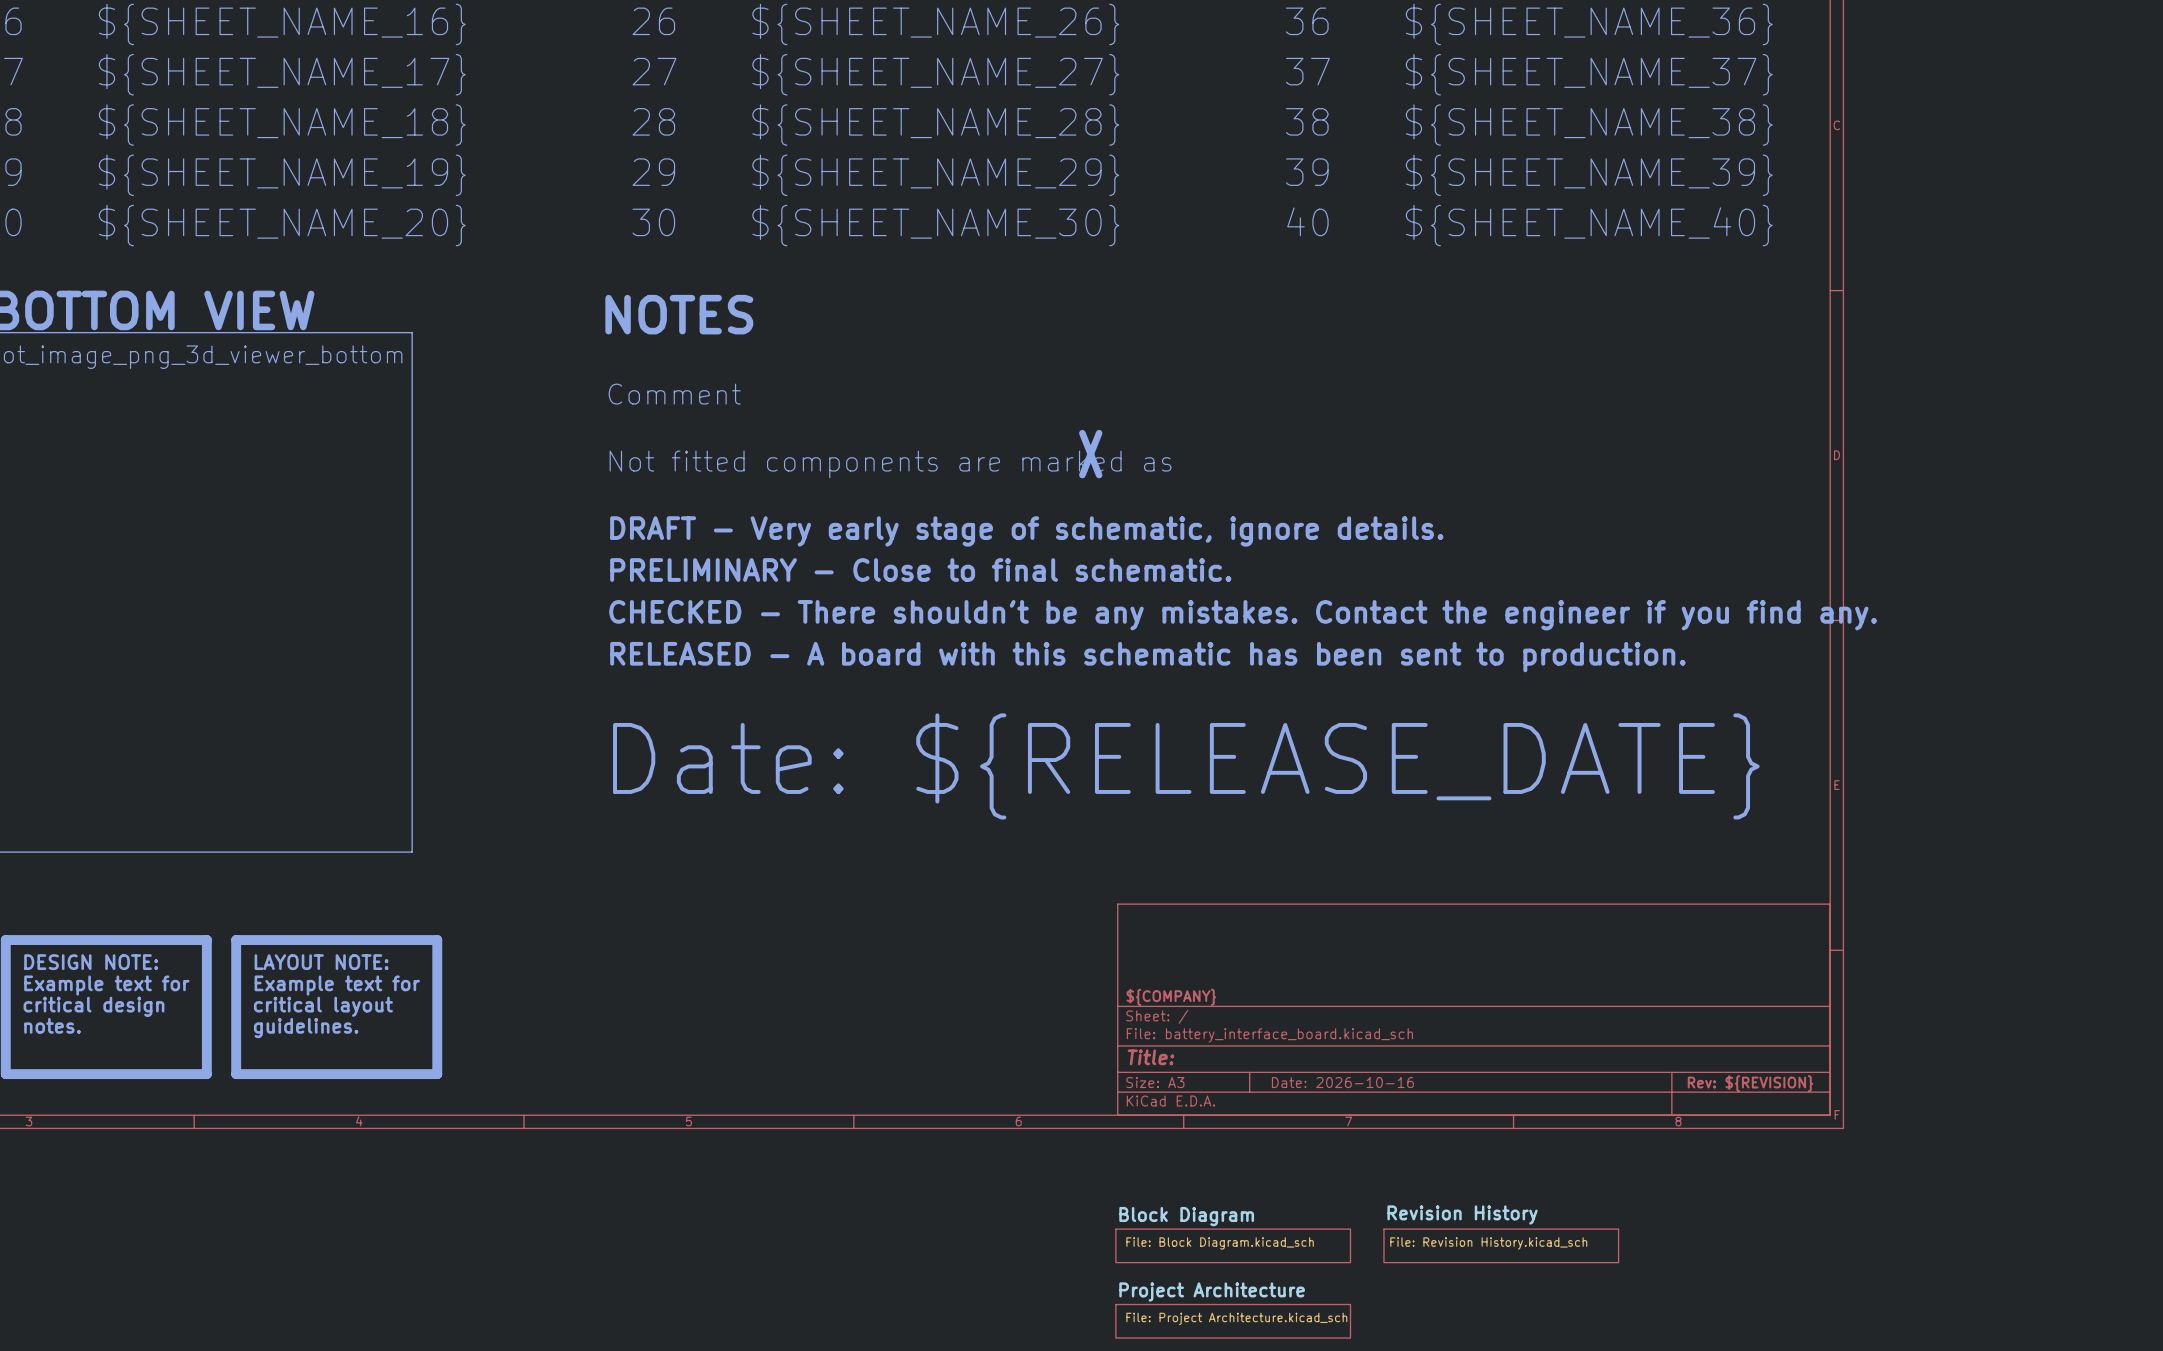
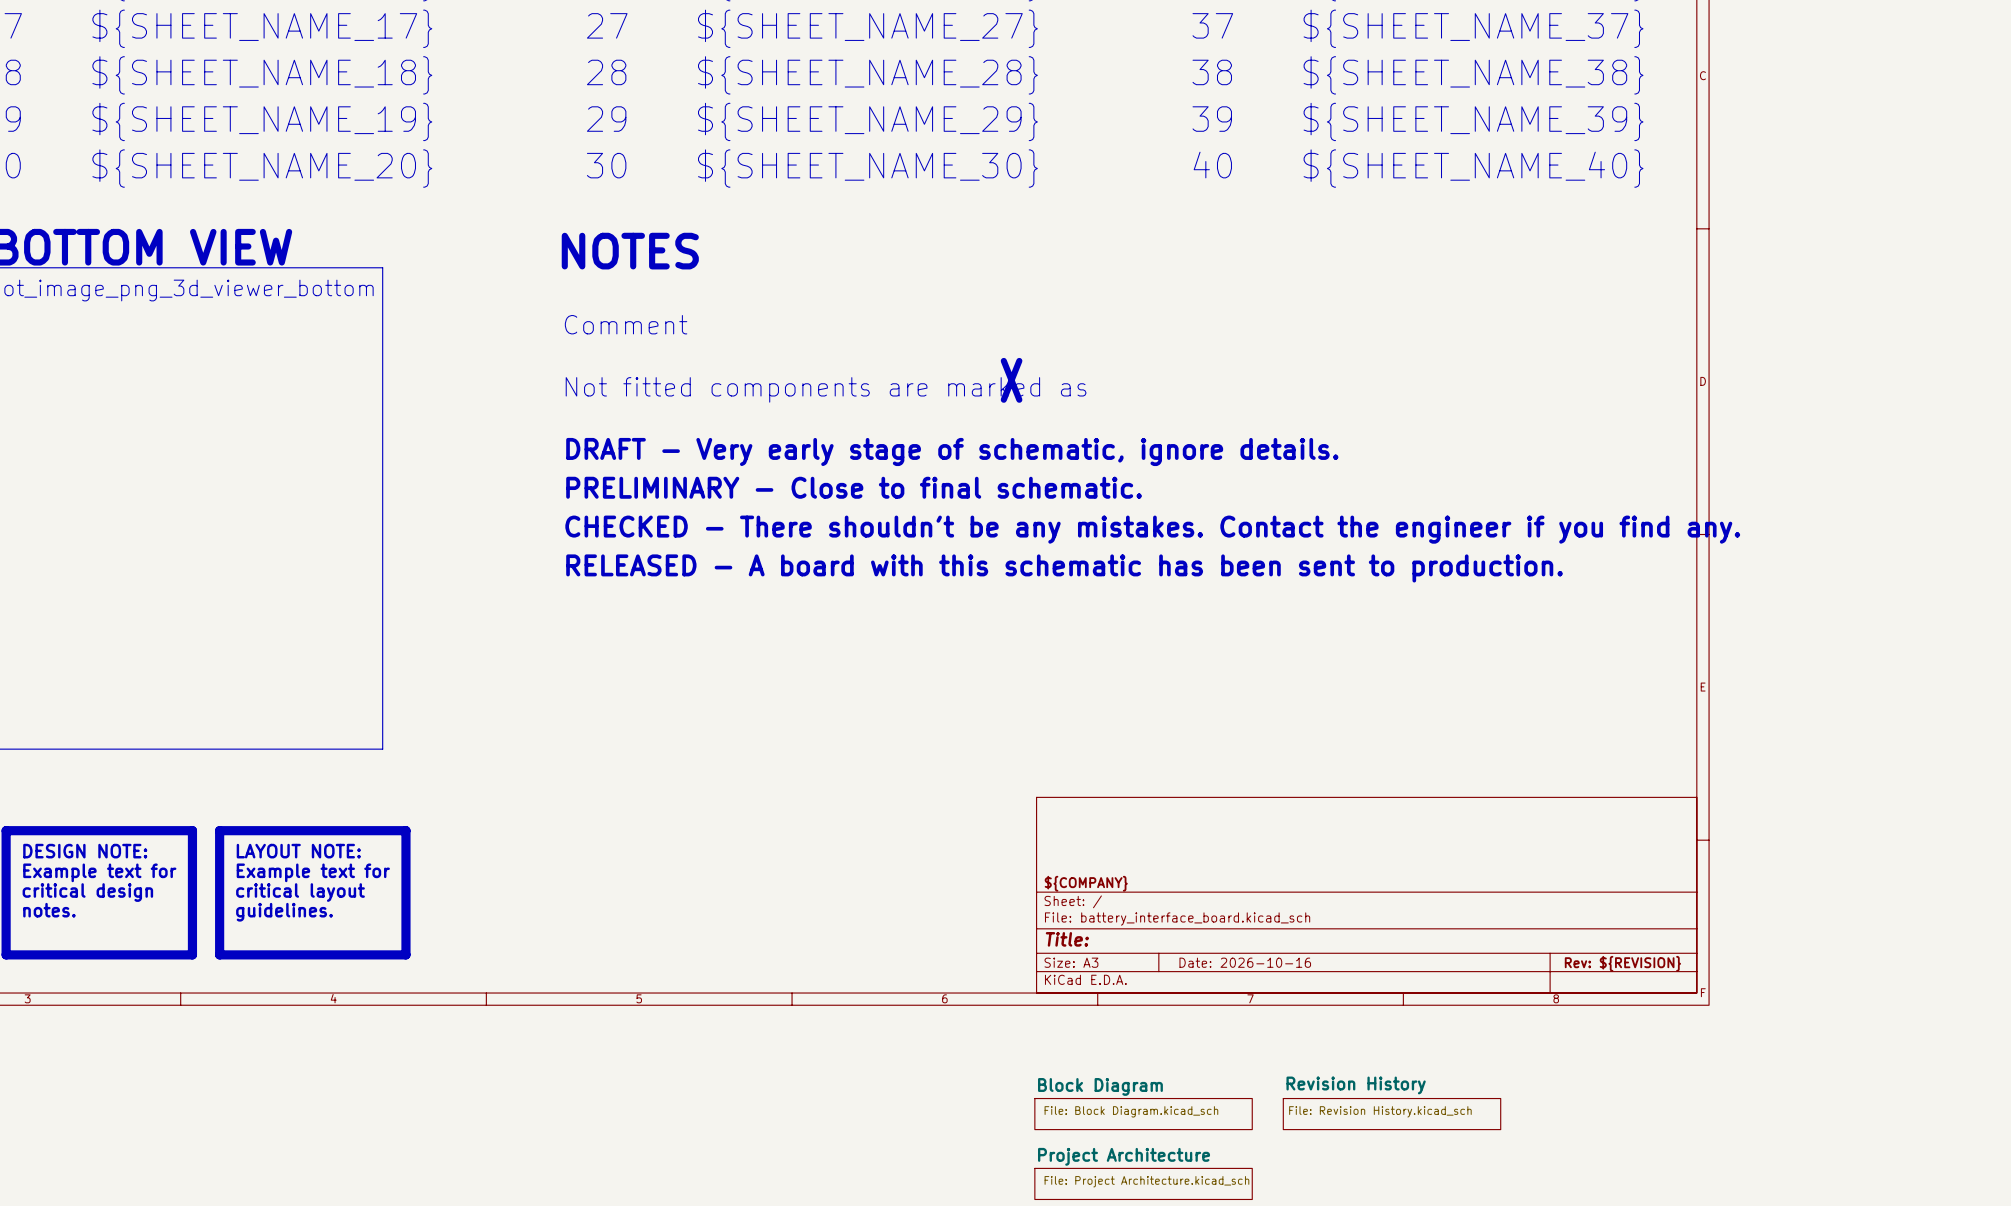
text: Date: ${RELEASE_DATE} (1186, 766) -> none

